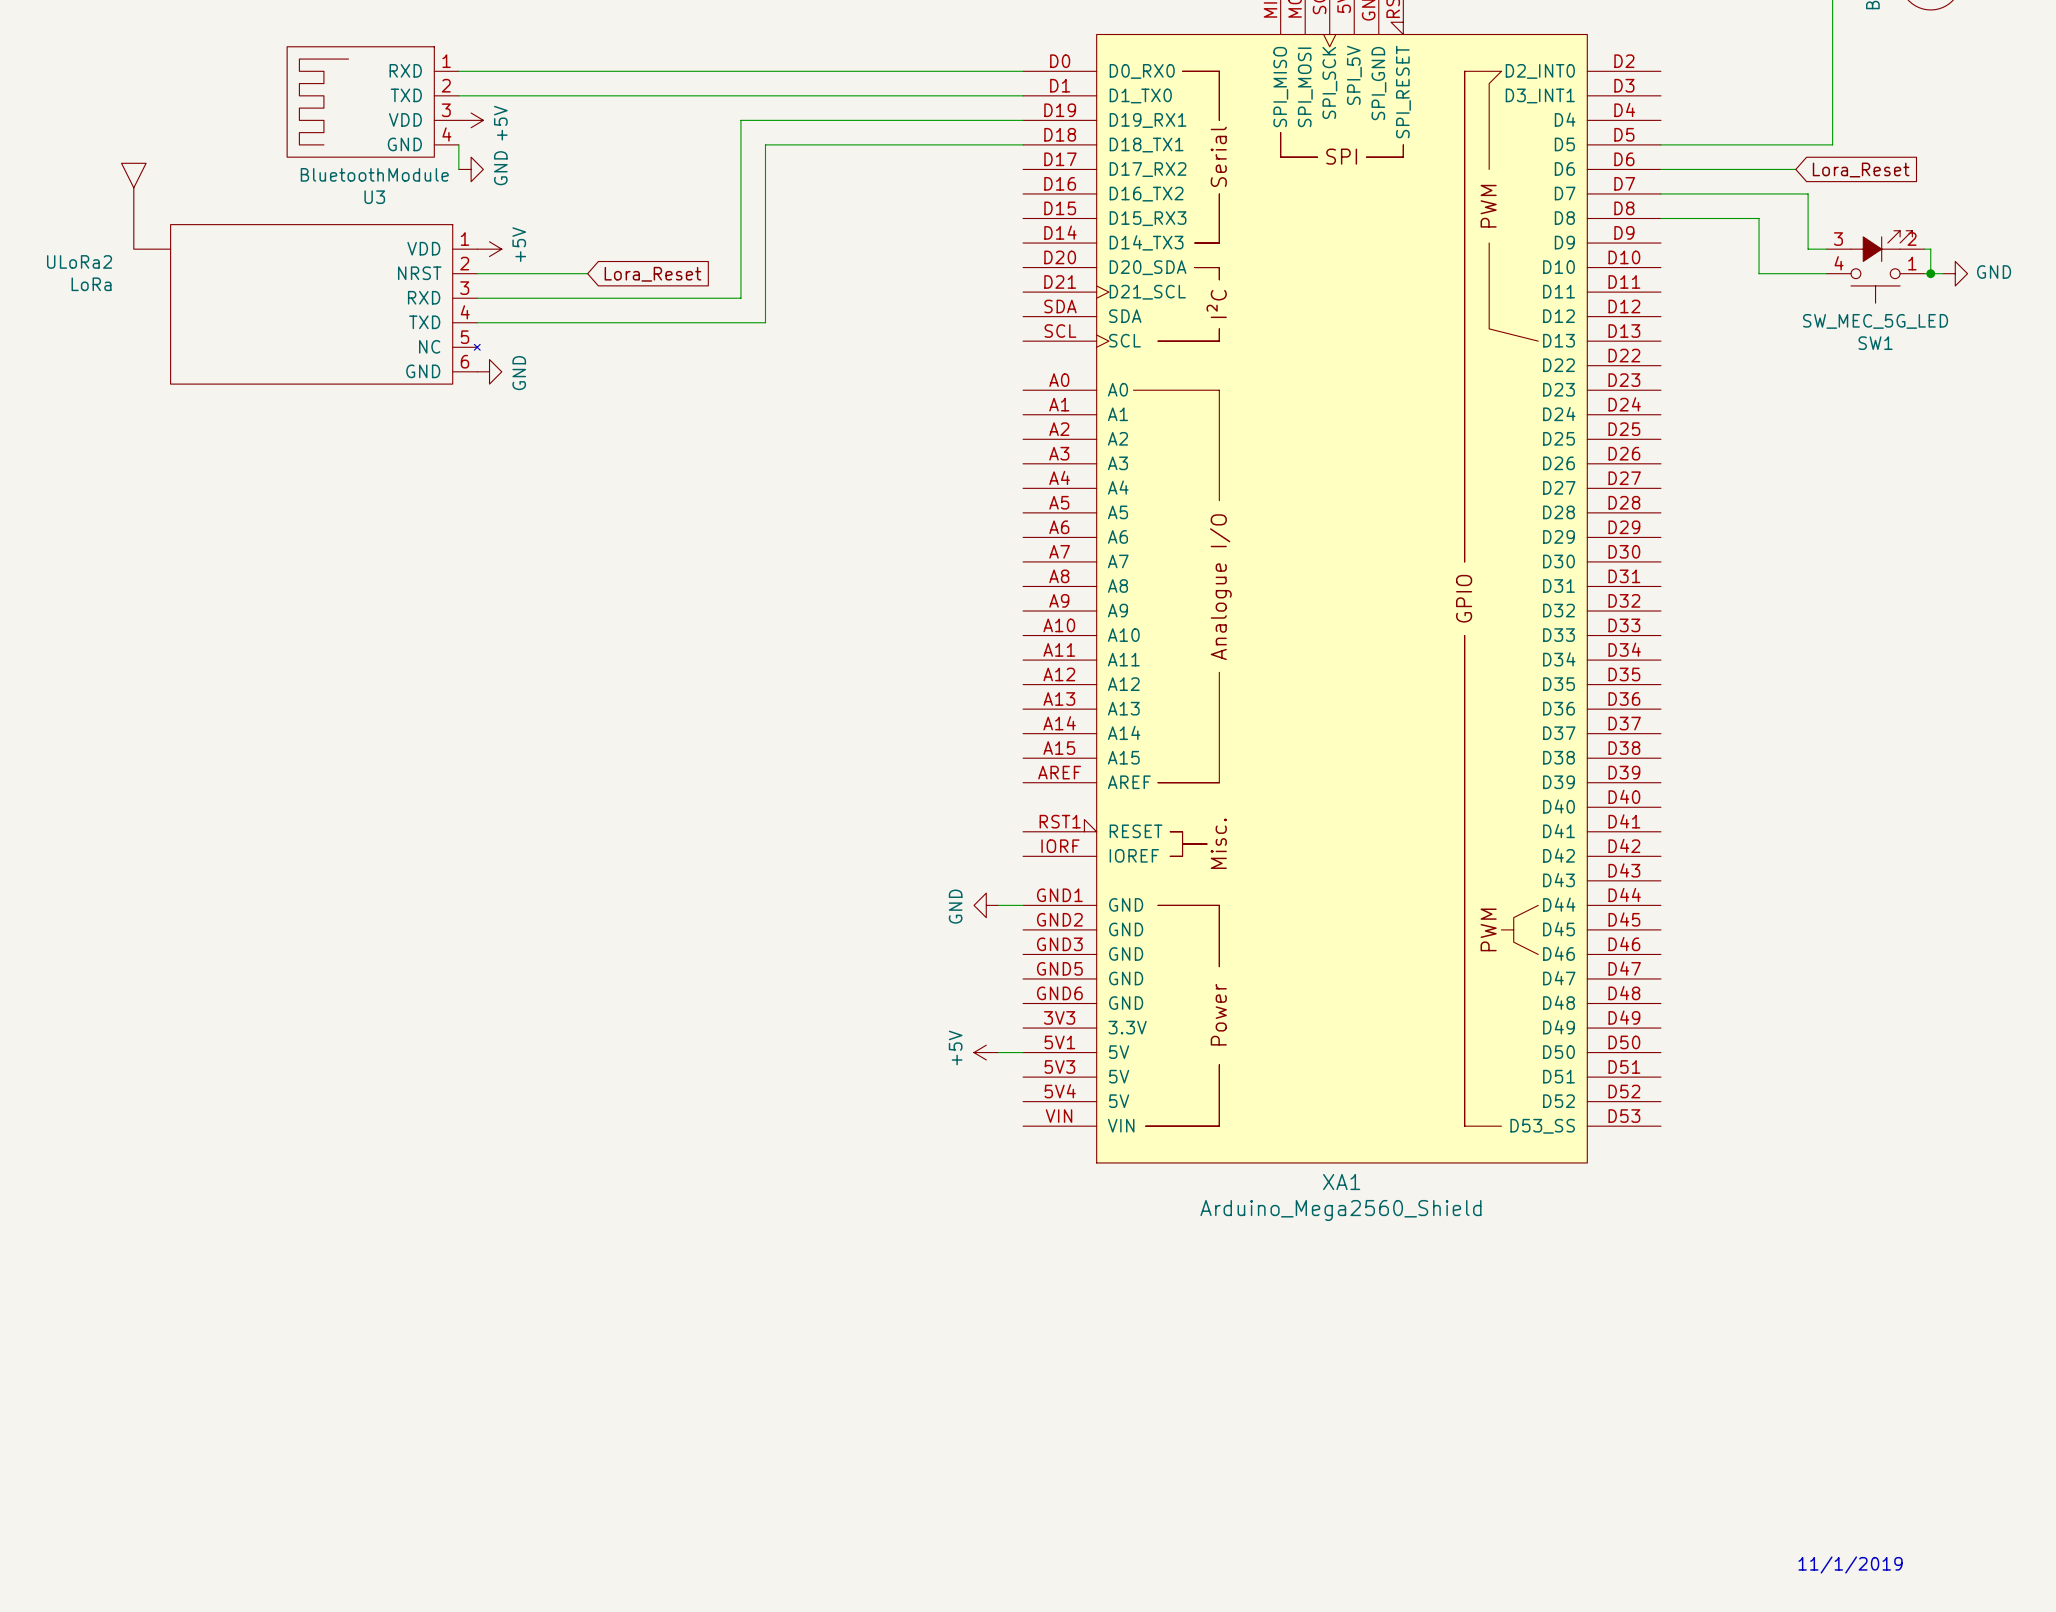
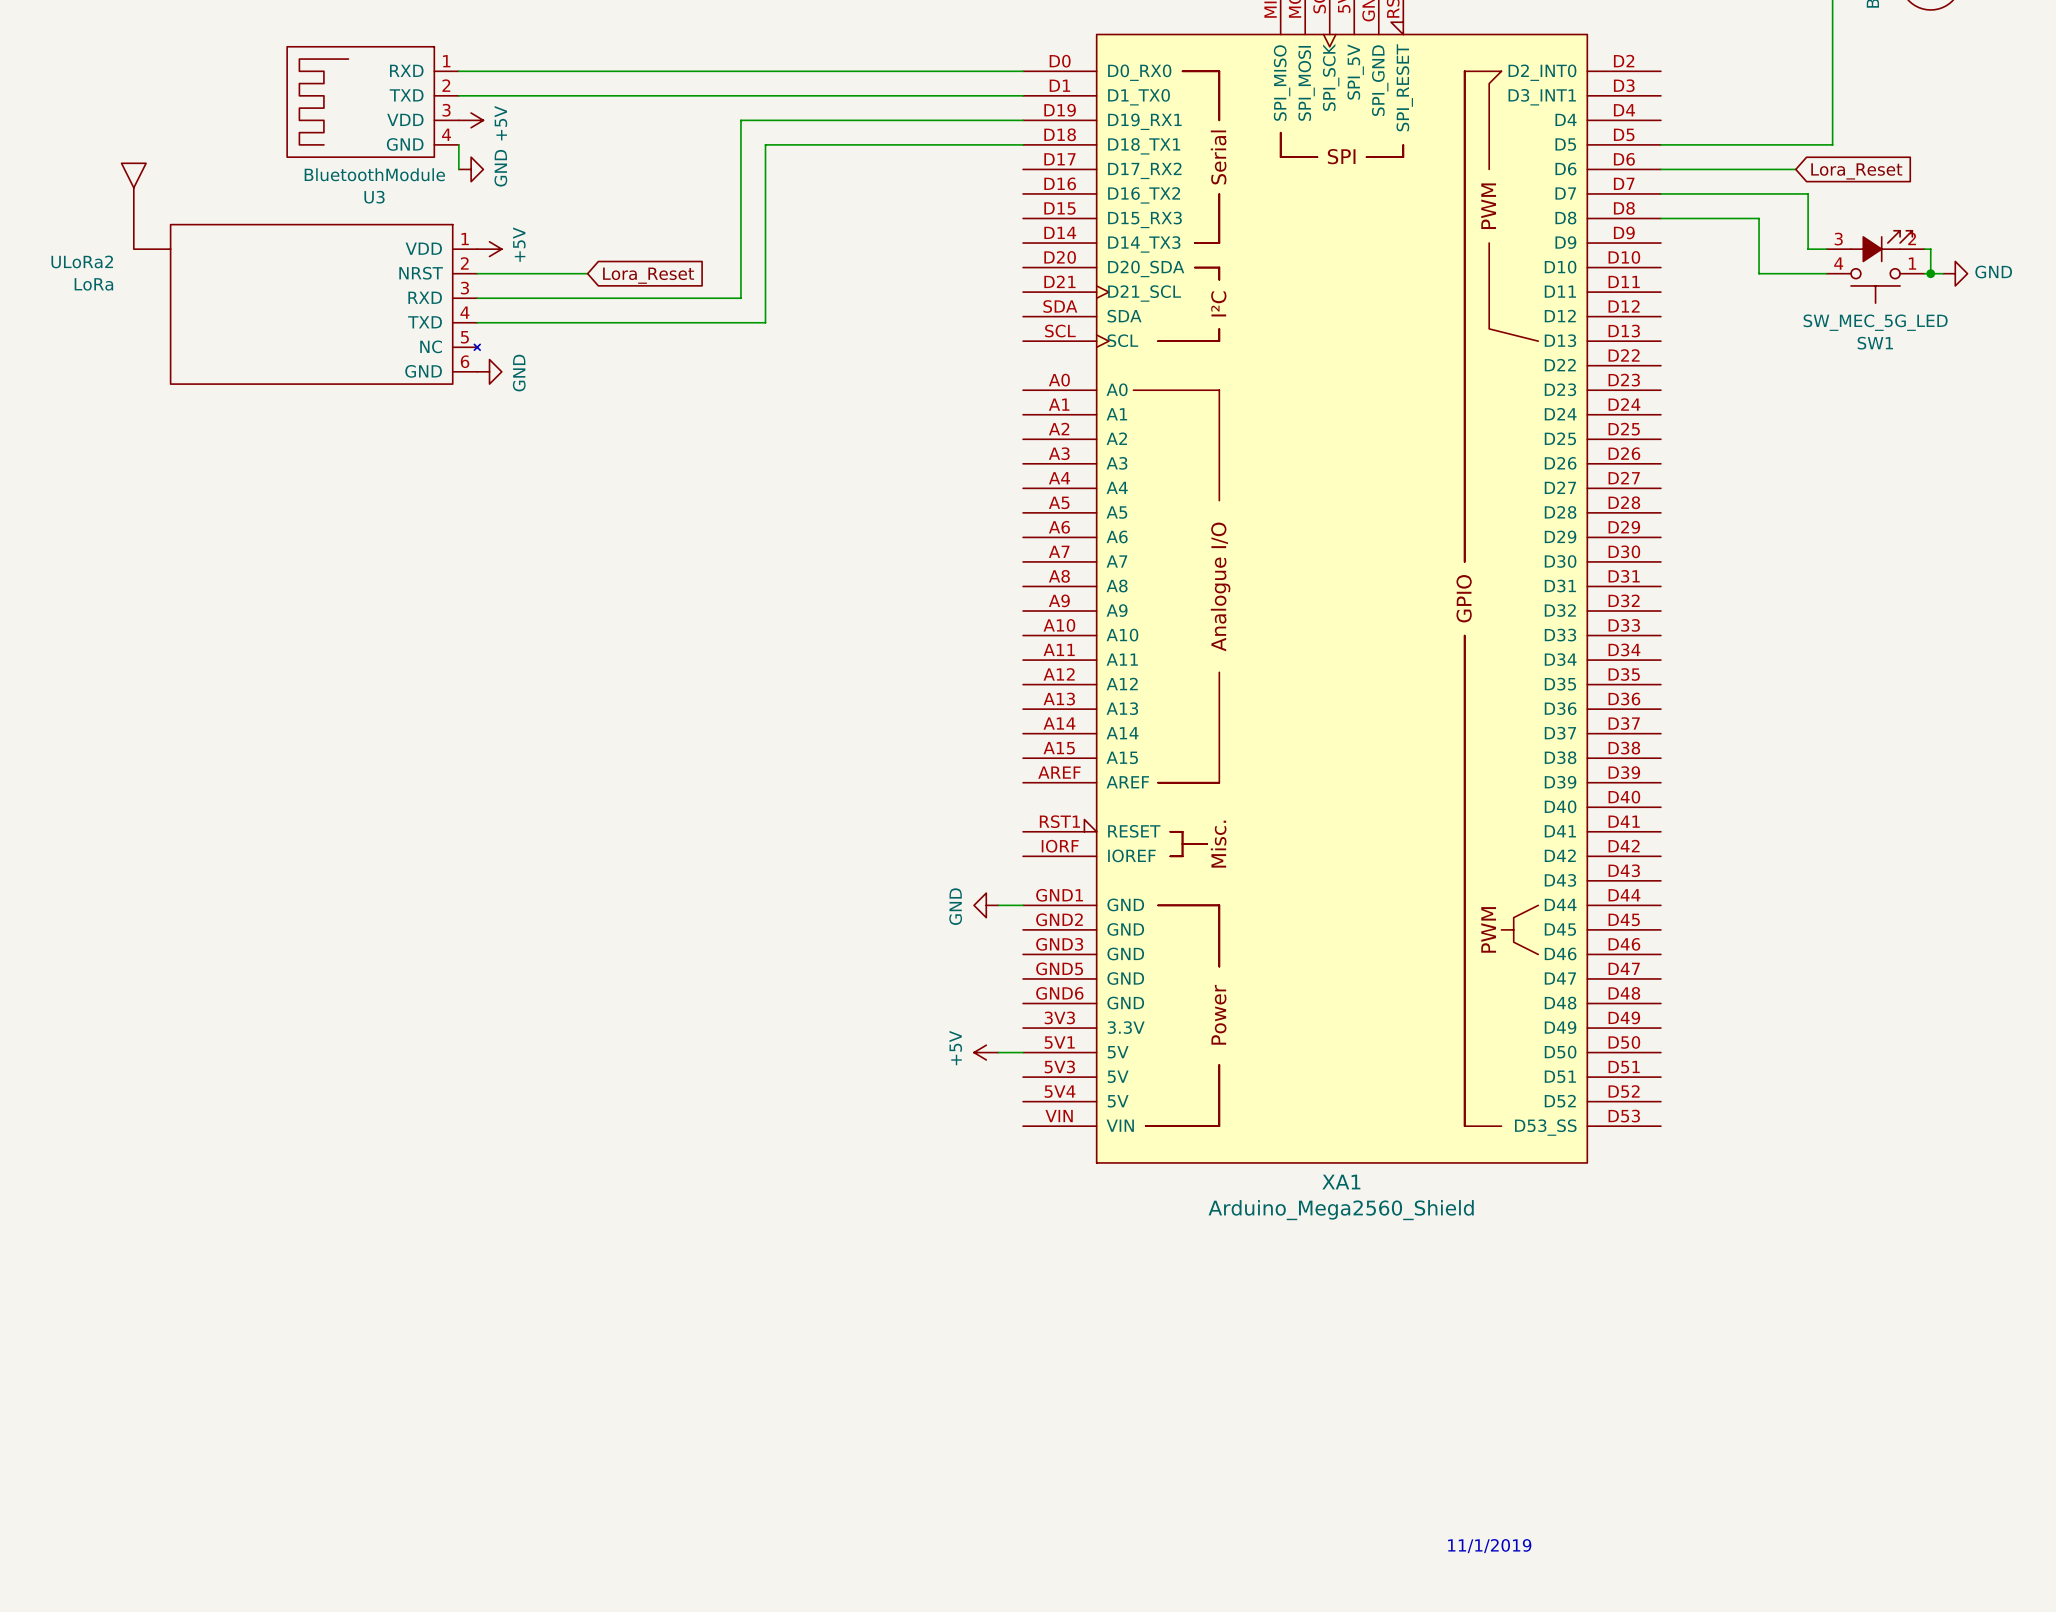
text: none -> 11/1/2019 (1489, 1546)
text: 11/1/2019 (1850, 1564) -> none

